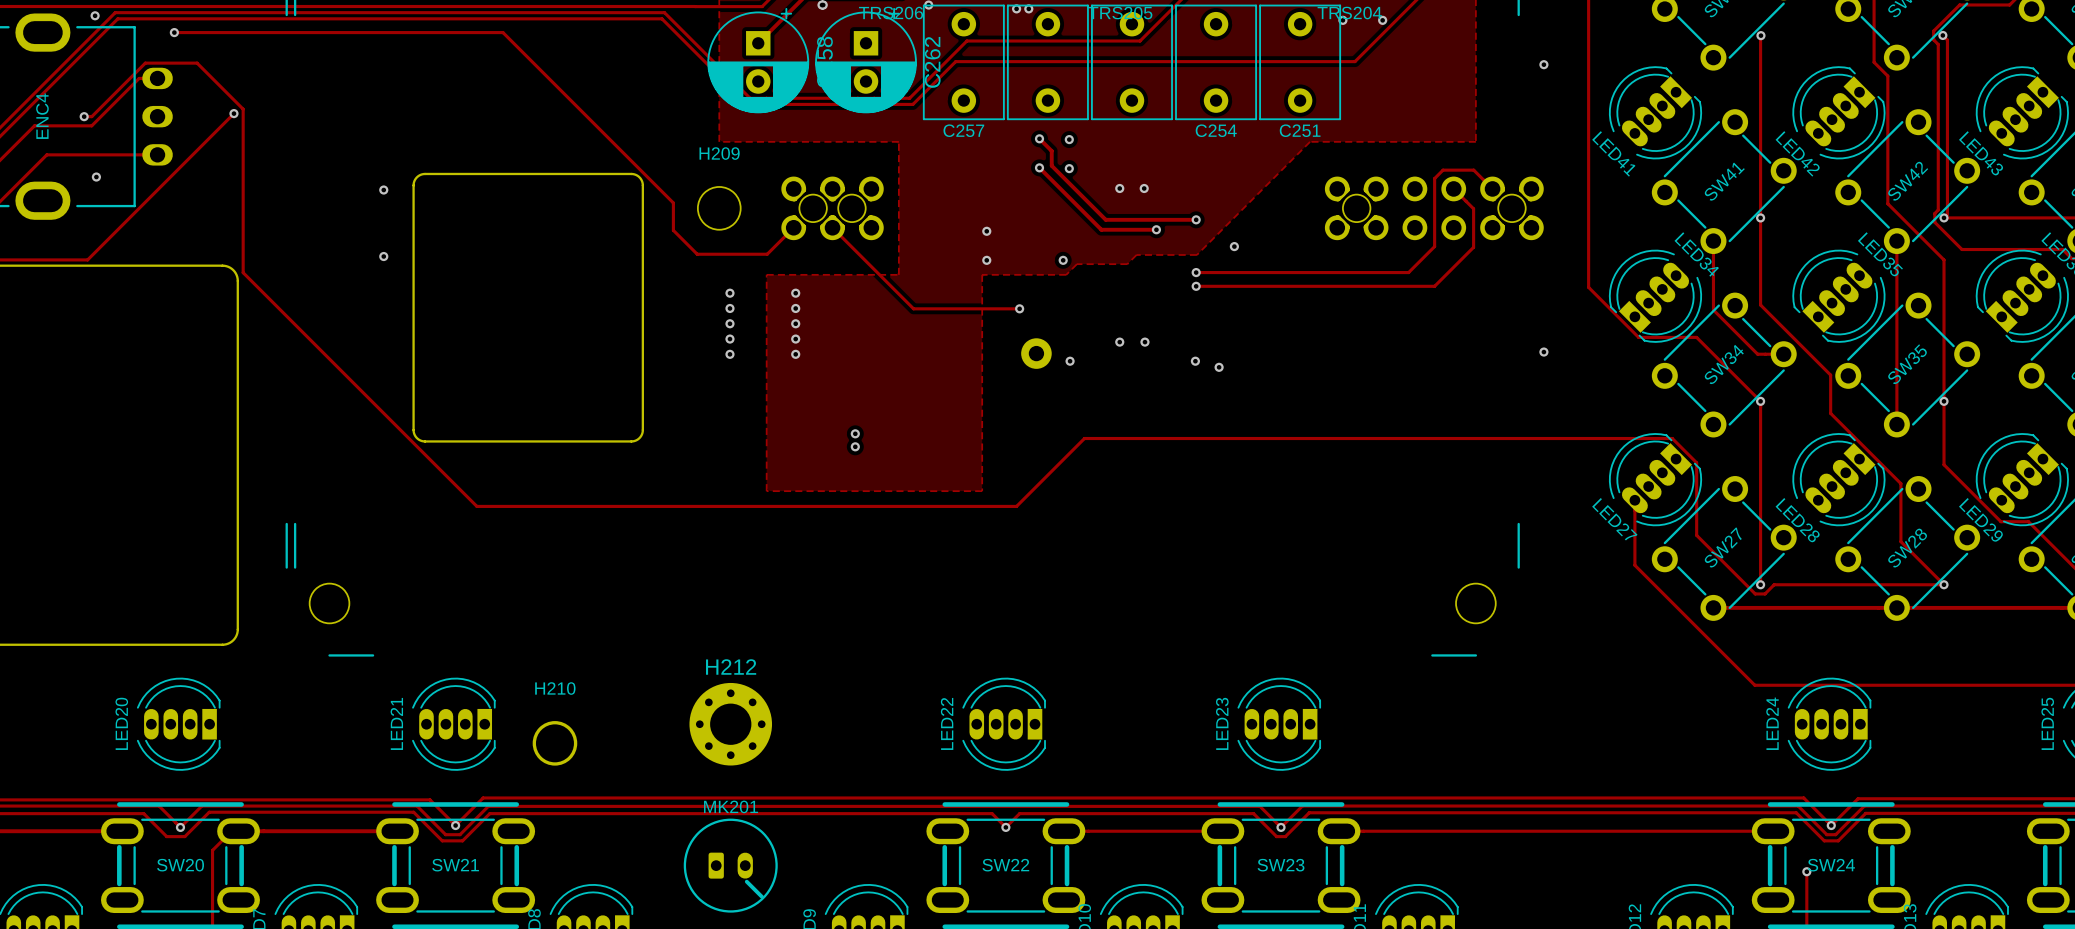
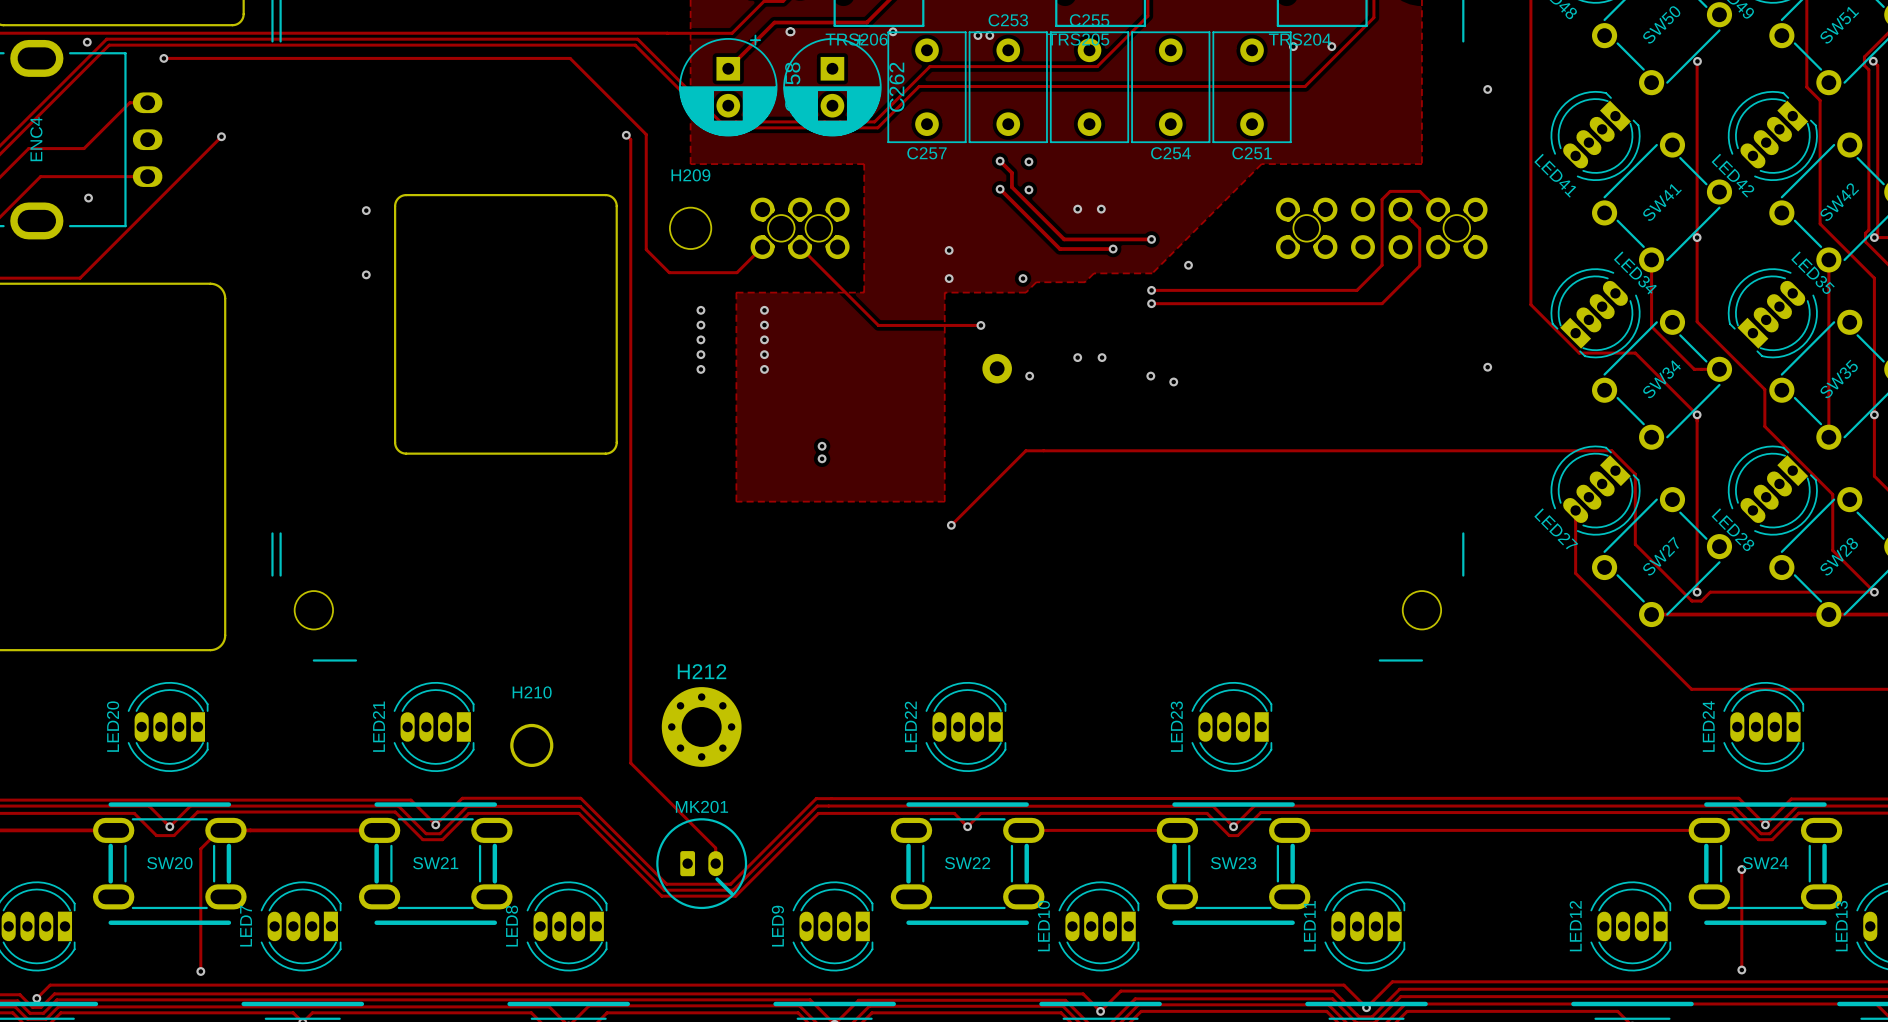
track: (503, 32) (673, 202) -> (481, 58) (570, 58) (646, 134) (646, 223)
track: none -> (626, 135) (630, 139) (630, 763) (715, 848) (715, 863)
via: none -> (626, 135)
track: (84, 116) (91, 116) (145, 63) (197, 63) (243, 109) (243, 272) (476, 506) (1016, 506) (1084, 438) -> (951, 525) (1025, 450) (1043, 450)
via: (84, 116) -> none
via: none -> (951, 525)
track: (605, 797) (1803, 797) -> (580, 798) (666, 884) (730, 884) (816, 798) (1738, 798)
track: (605, 806) (1259, 806) -> (580, 806) (664, 890) (733, 890) (817, 806) (1213, 806)
track: (603, 813) (932, 813) -> (579, 813) (661, 896) (735, 896) (818, 813) (896, 813)

